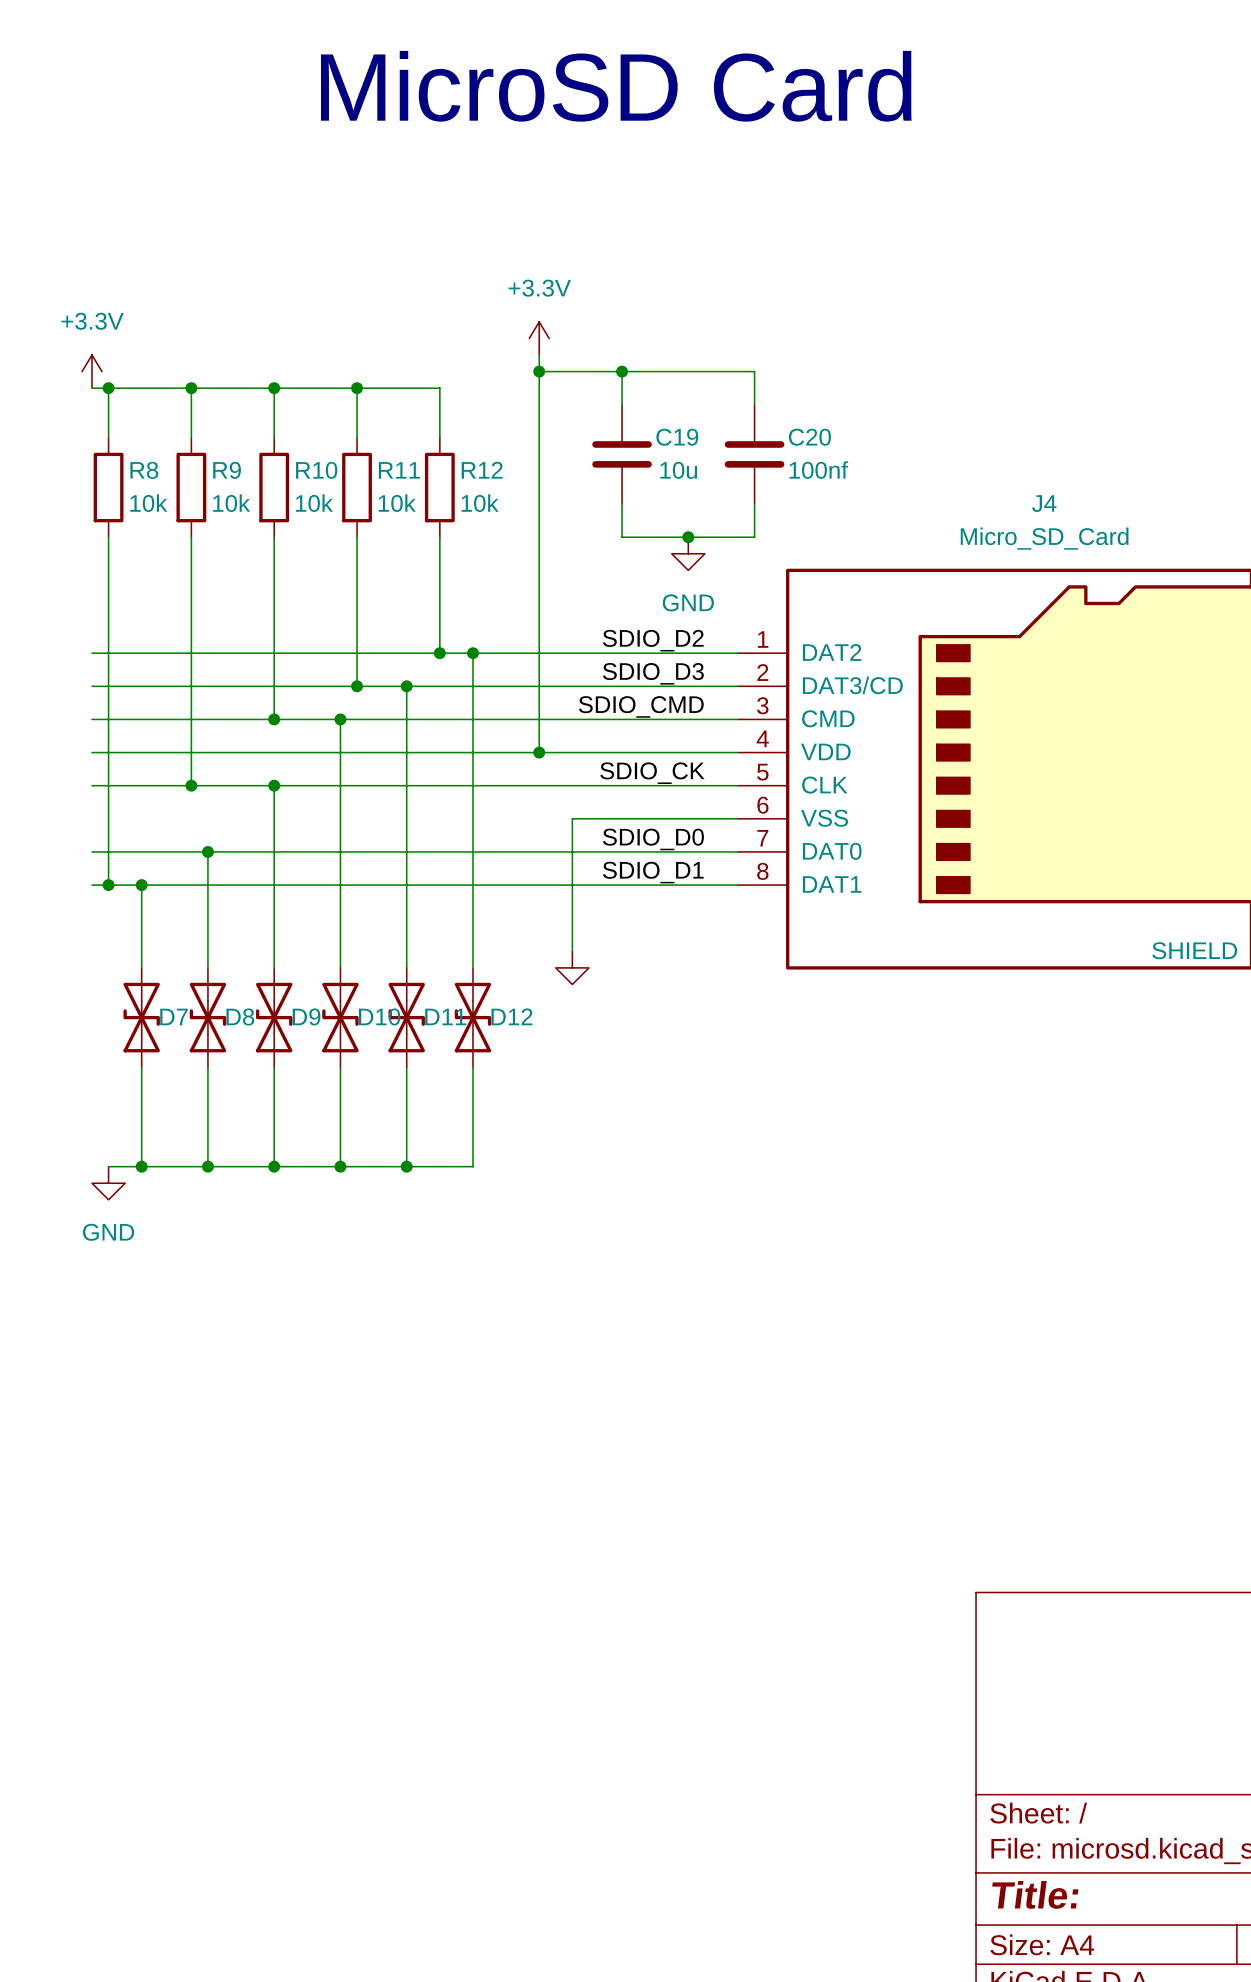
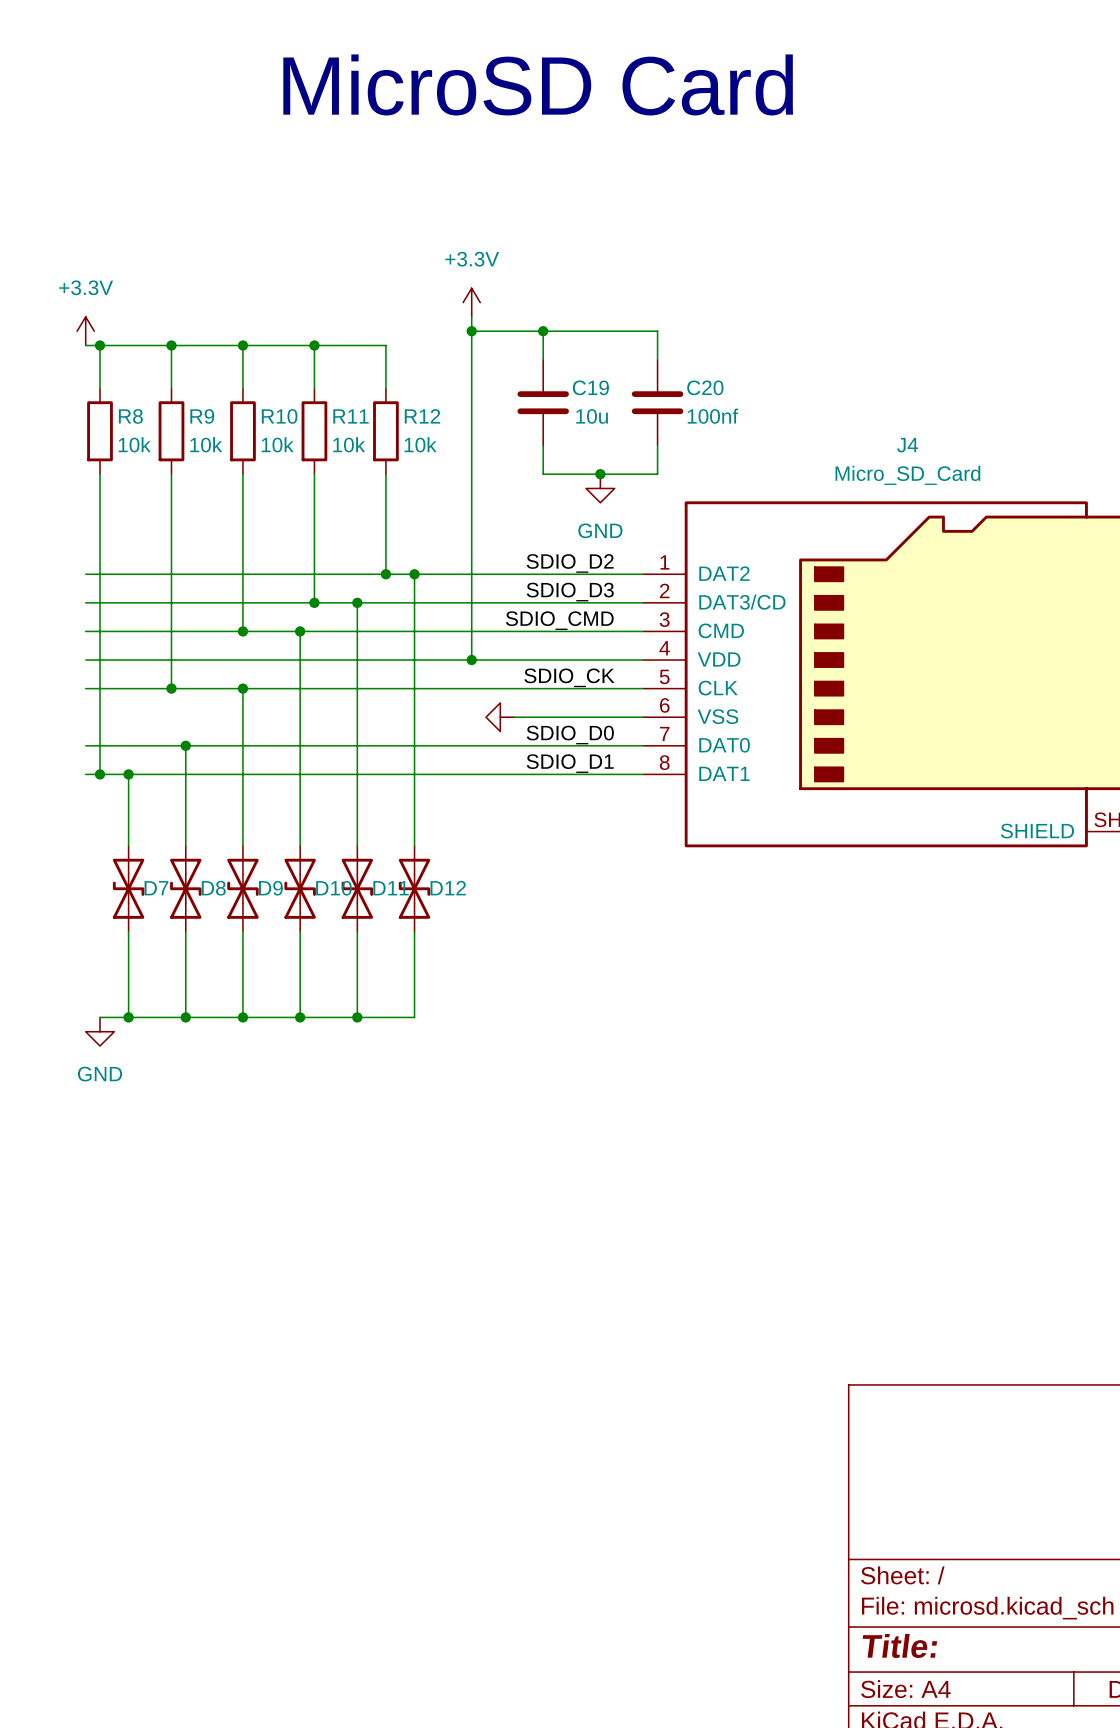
wire: (588, 818) (572, 818) (572, 951) -> none
power symbol rotation: 0° (572, 967) -> 90° clockwise (500, 717)
power symbol position: (572, 967) -> (500, 717)

